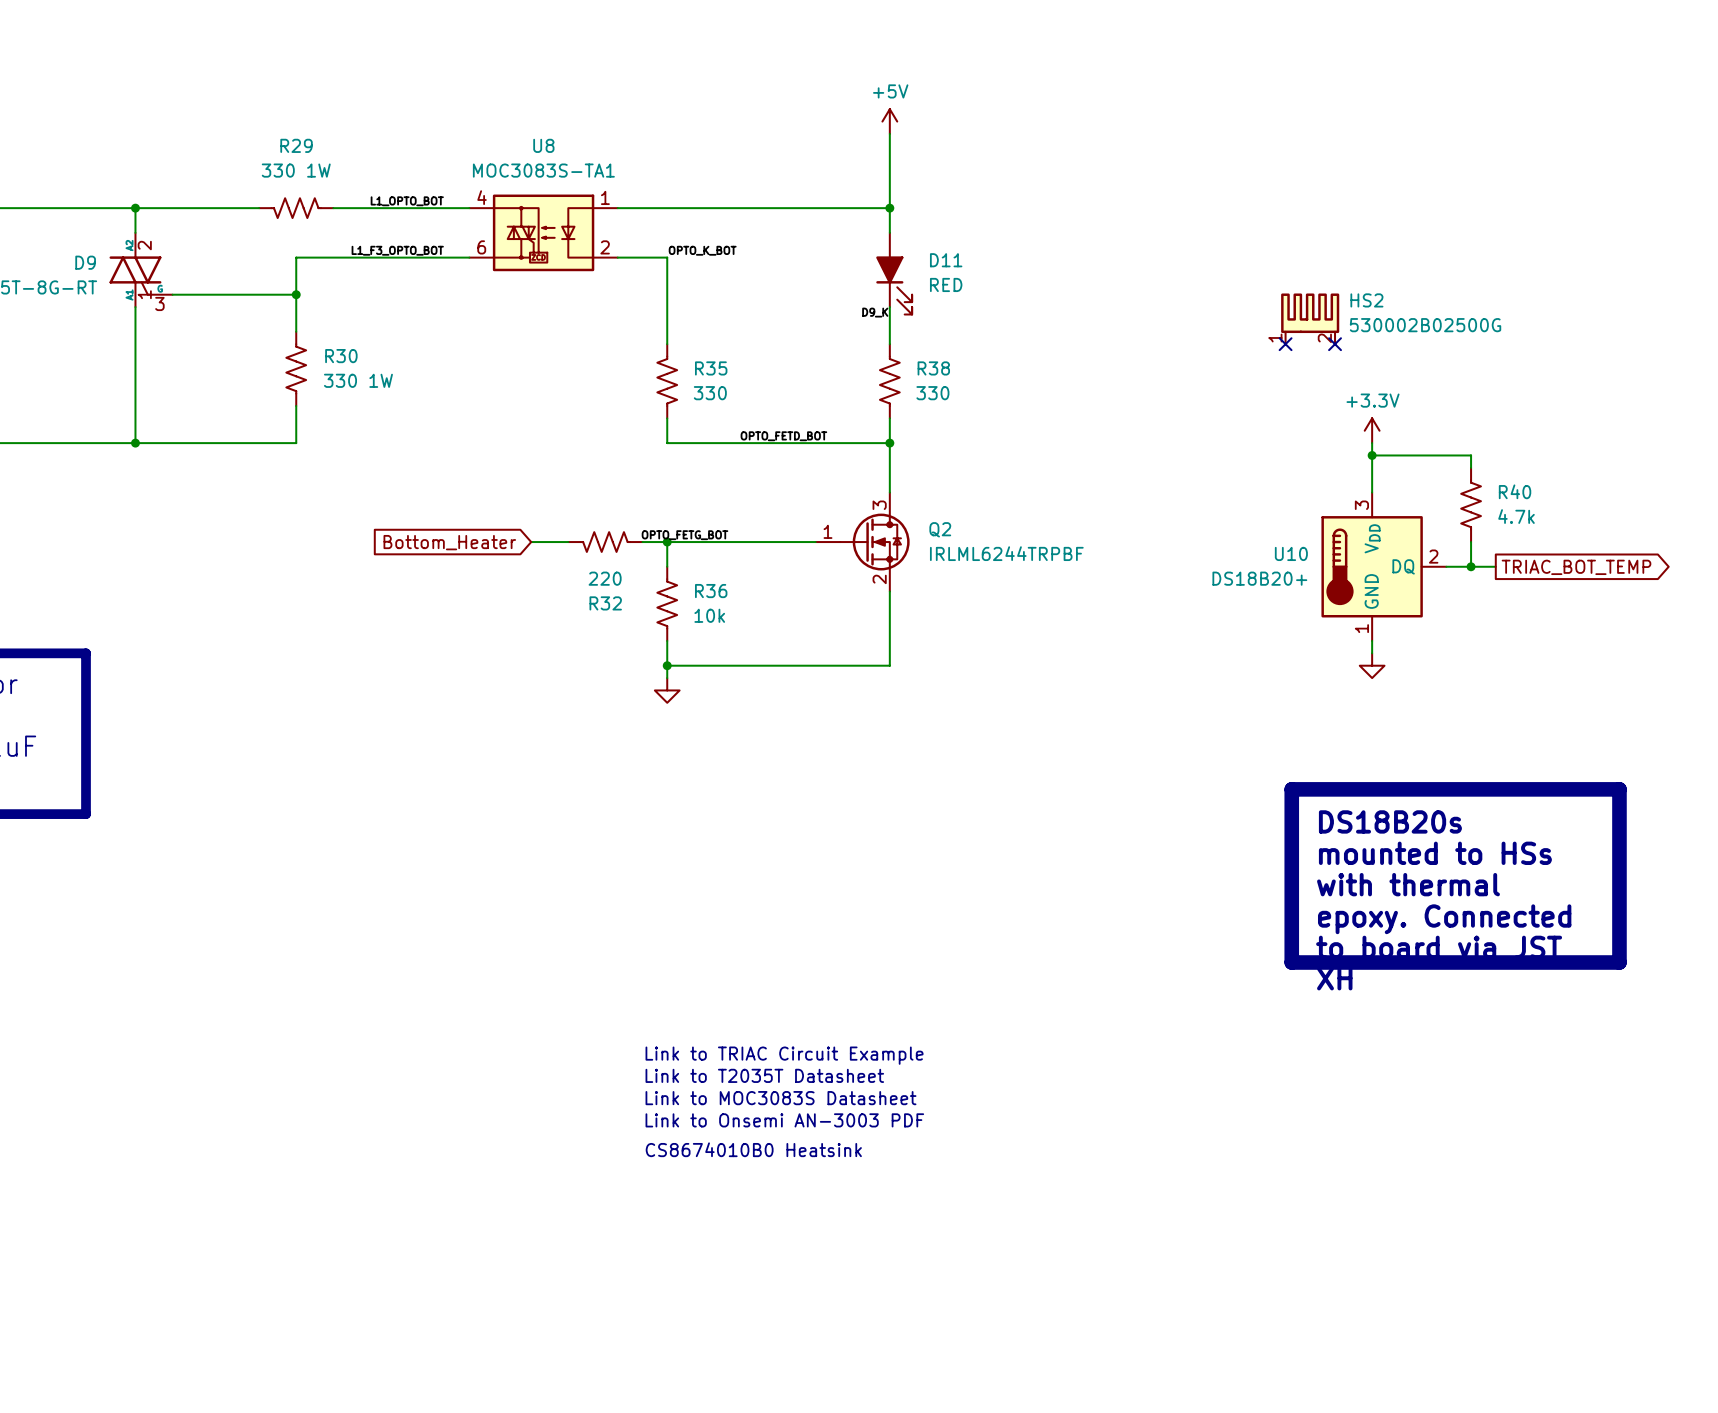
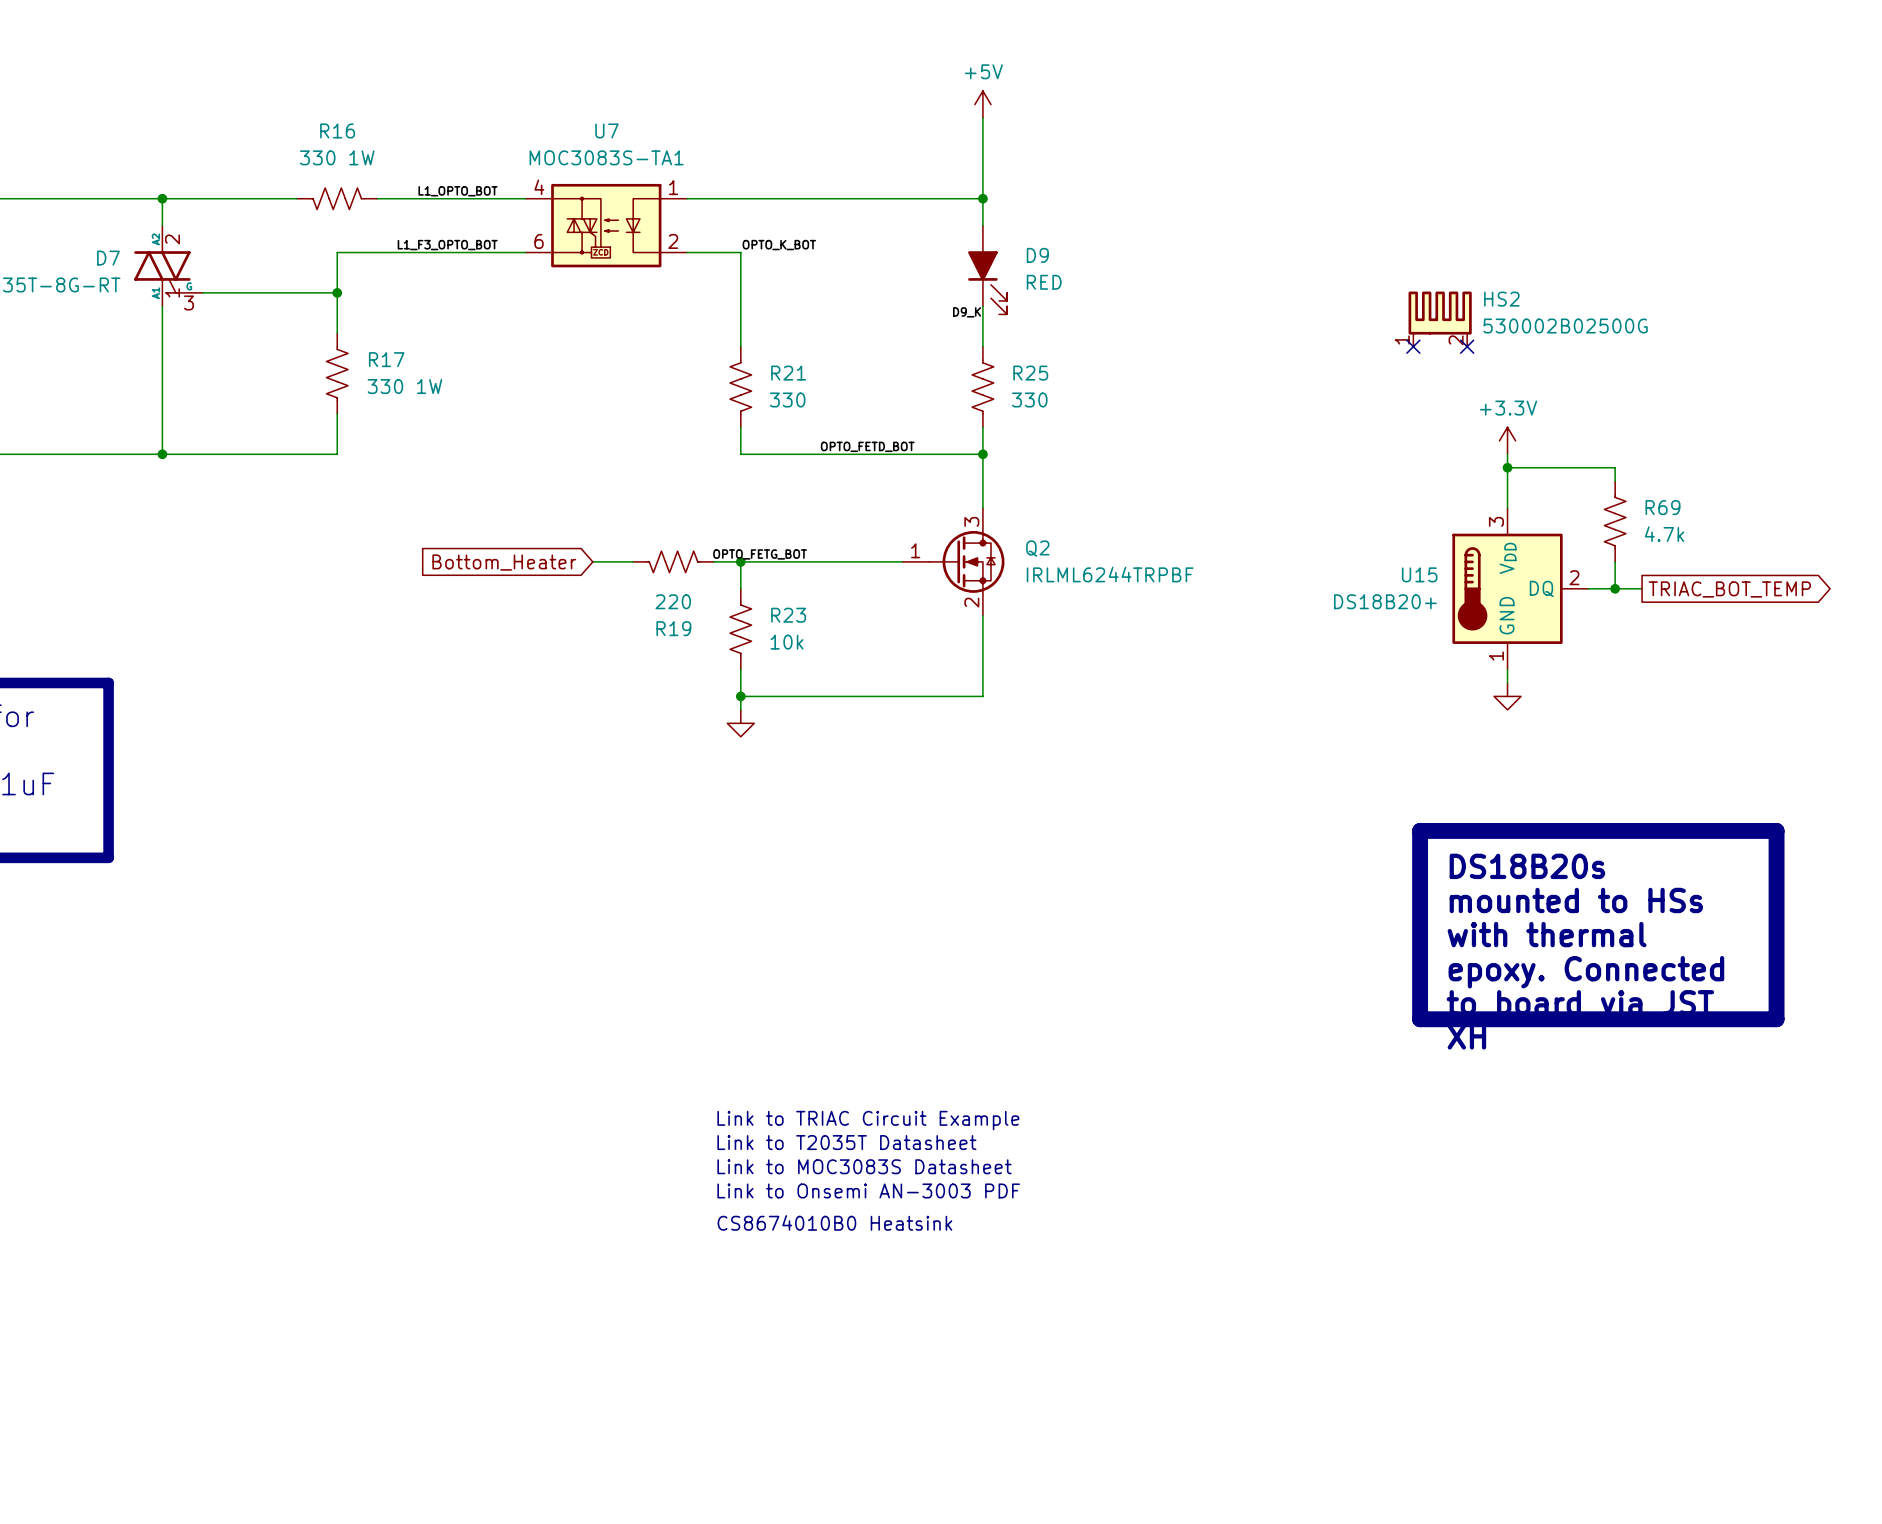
R29 name: R29 (296, 145) -> R16 (337, 130)
U8 name: U8 (543, 145) -> U7 (606, 130)
D11 name: D11 (946, 260) -> D9 (1037, 255)
D9 name: D9 (85, 262) -> D7 (108, 258)
R30 name: R30 (341, 356) -> R17 (386, 359)
R35 name: R35 (711, 368) -> R21 (788, 373)
R38 name: R38 (933, 368) -> R25 (1030, 373)
R40 name: R40 (1515, 491) -> R69 (1662, 507)
U10 name: U10 (1291, 553) -> U15 (1419, 574)
R36 name: R36 (711, 591) -> R23 (788, 615)
R32 name: R32 (605, 603) -> R19 (673, 628)

